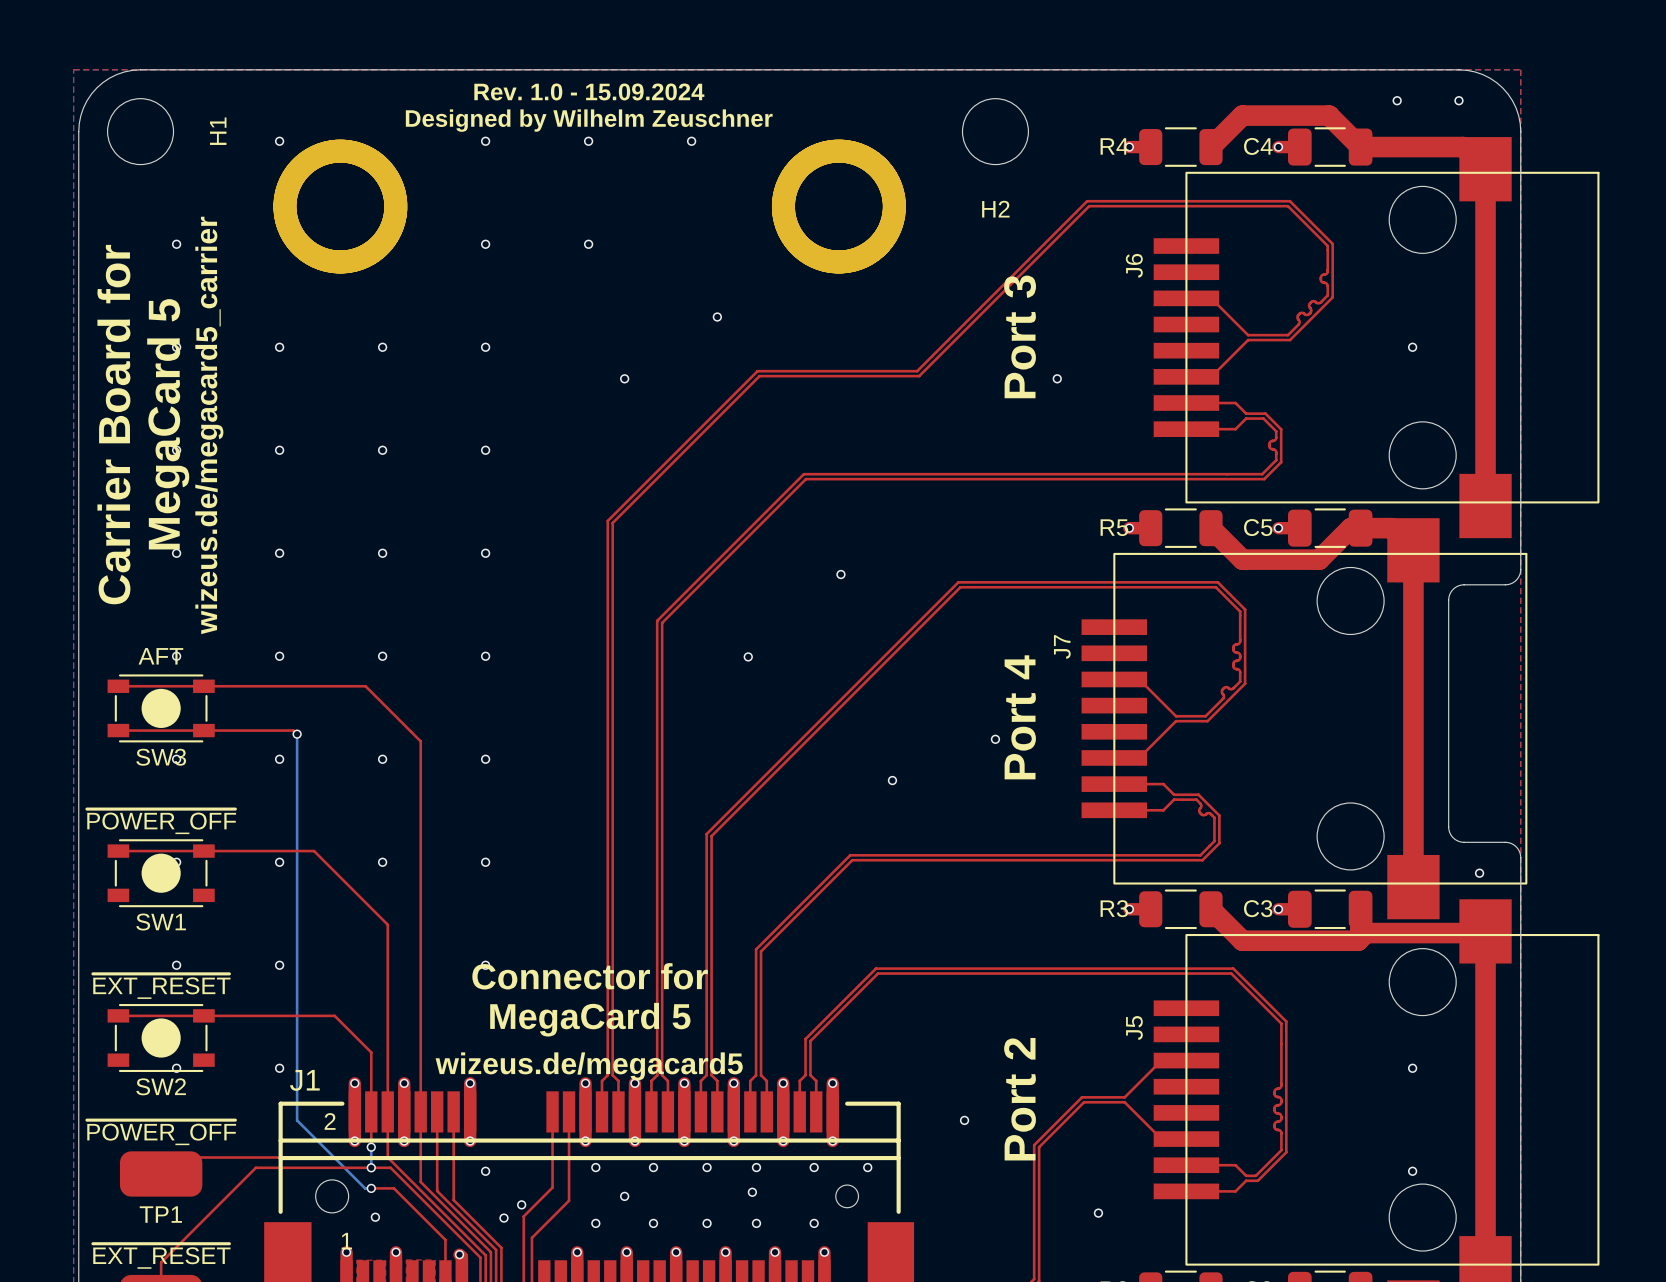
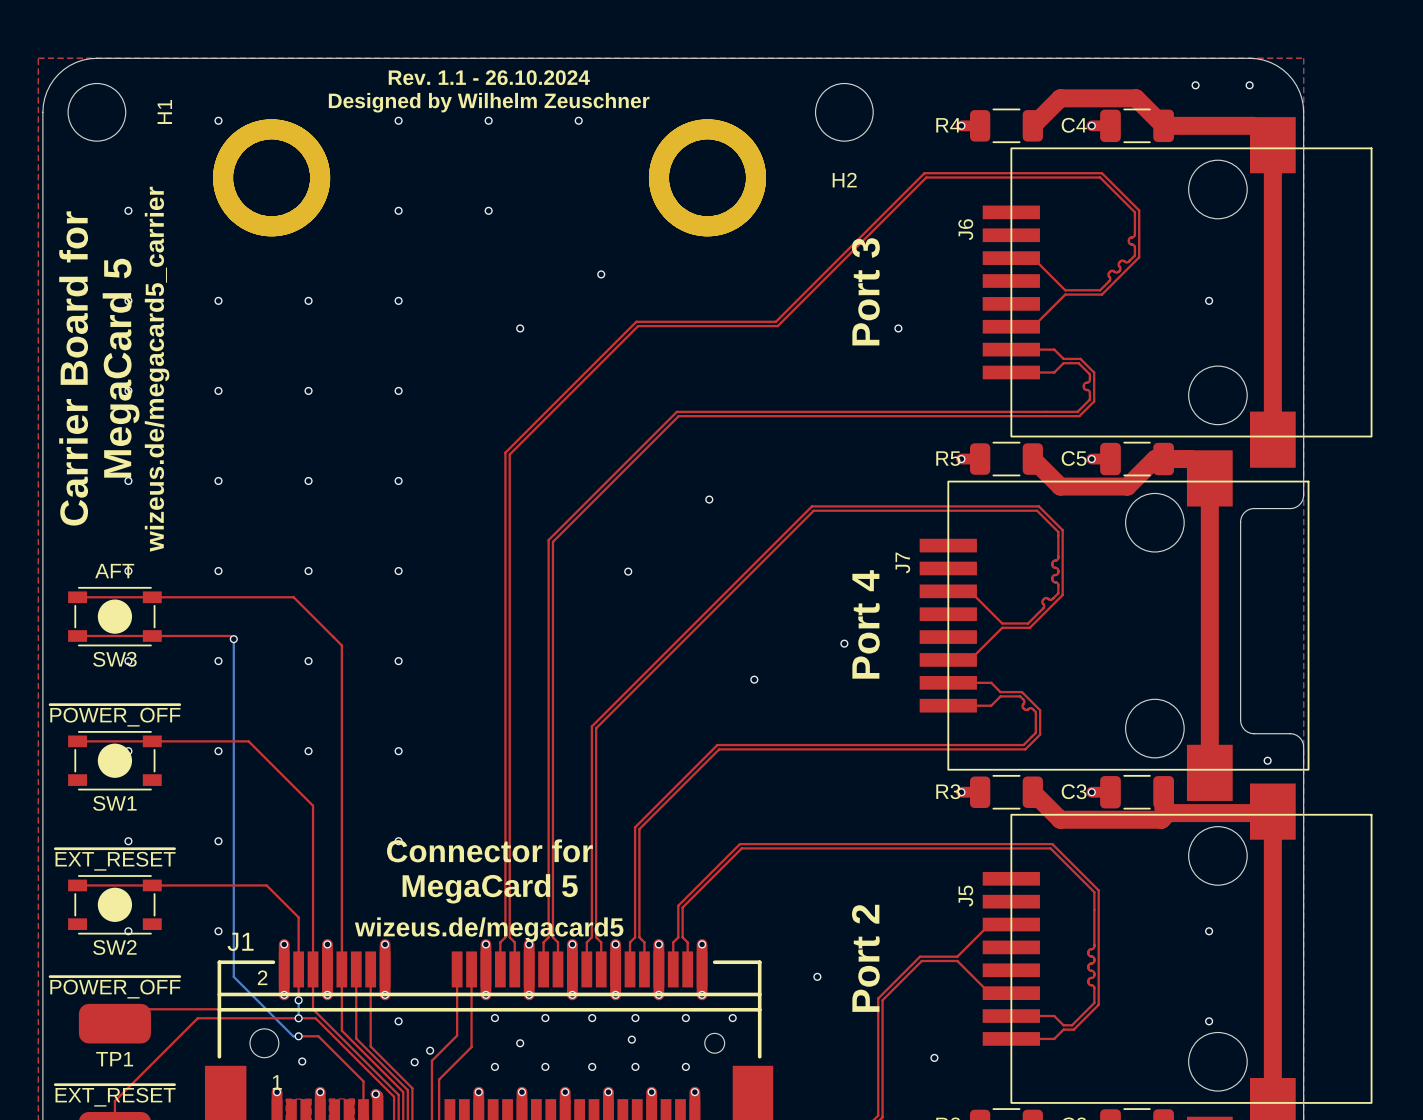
text: Rev. 1.0 - 15.09.2024 (589, 91) -> Rev. 1.1 - 26.10.2024 (489, 77)

